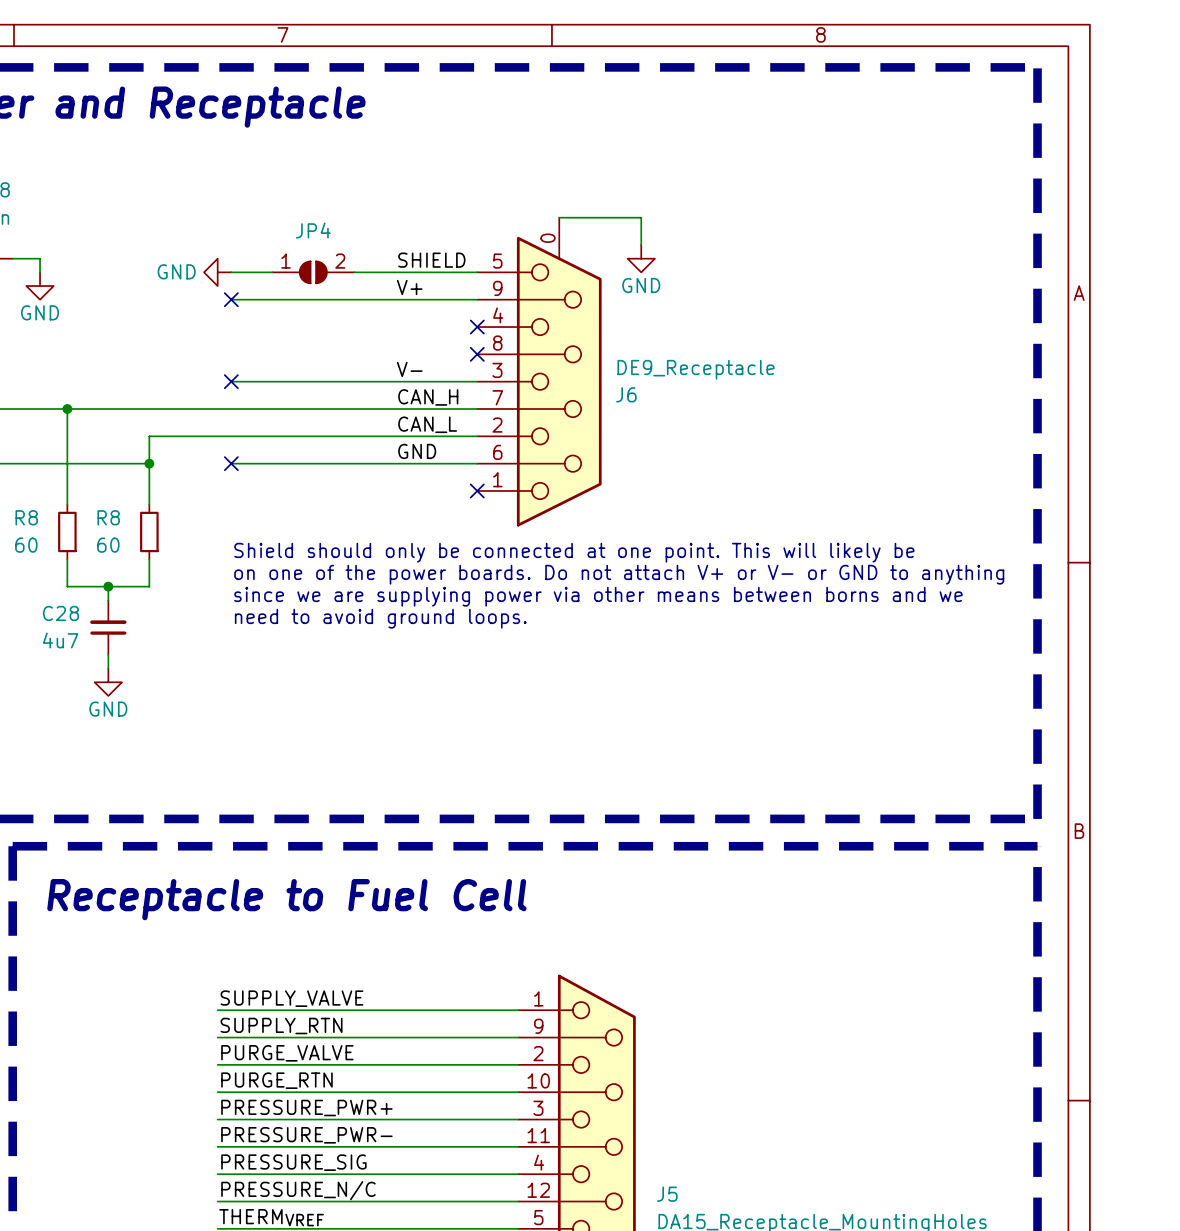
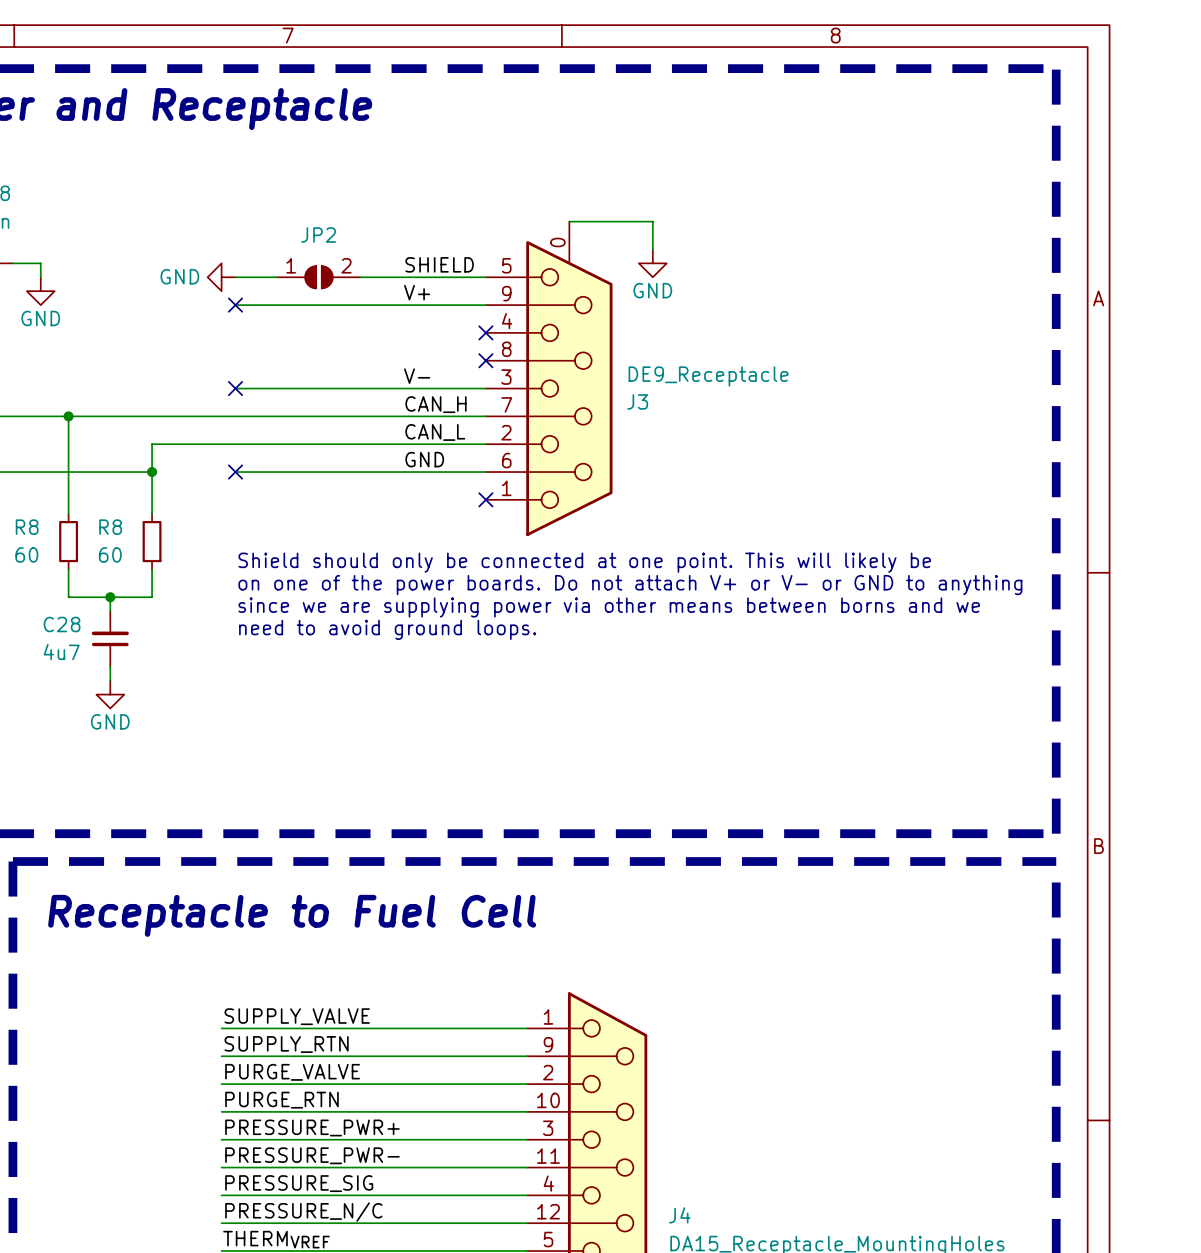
JP4 name: JP4 (313, 230) -> JP2 (318, 235)
J6 name: J6 (626, 394) -> J3 (637, 401)
J5 name: J5 (667, 1194) -> J4 (679, 1215)

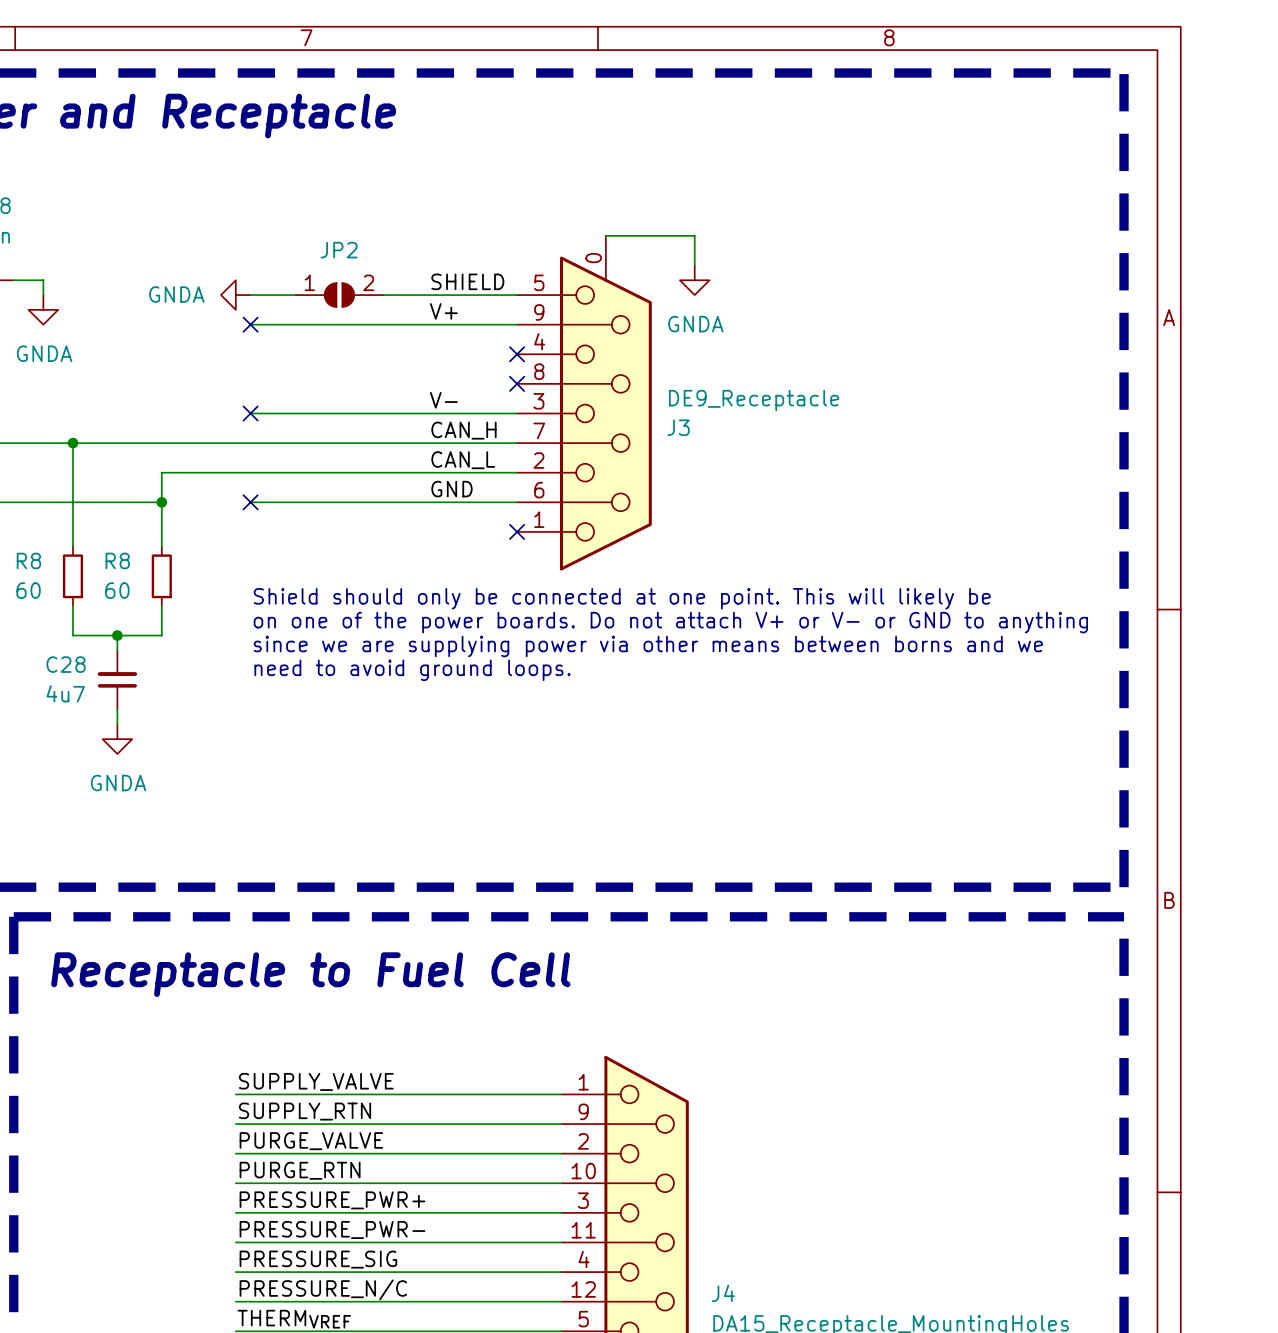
power symbol: GND (652, 263) -> GNDA (694, 280)
power symbol: GND (221, 277) -> GNDA (235, 295)
power symbol: GND (40, 291) -> GNDA (43, 309)
power symbol: GND (110, 694) -> GNDA (117, 739)

